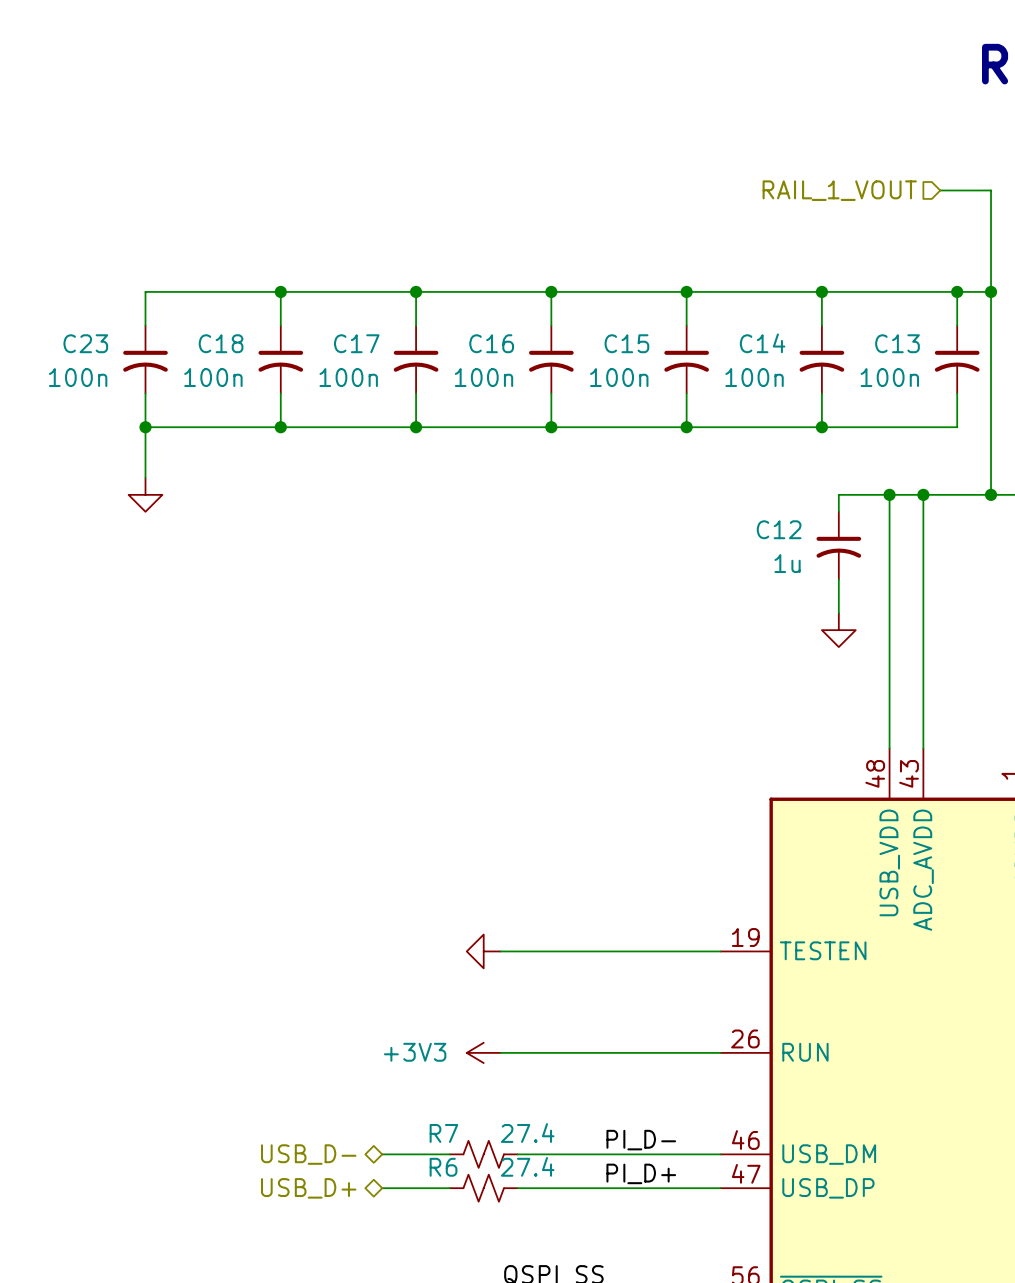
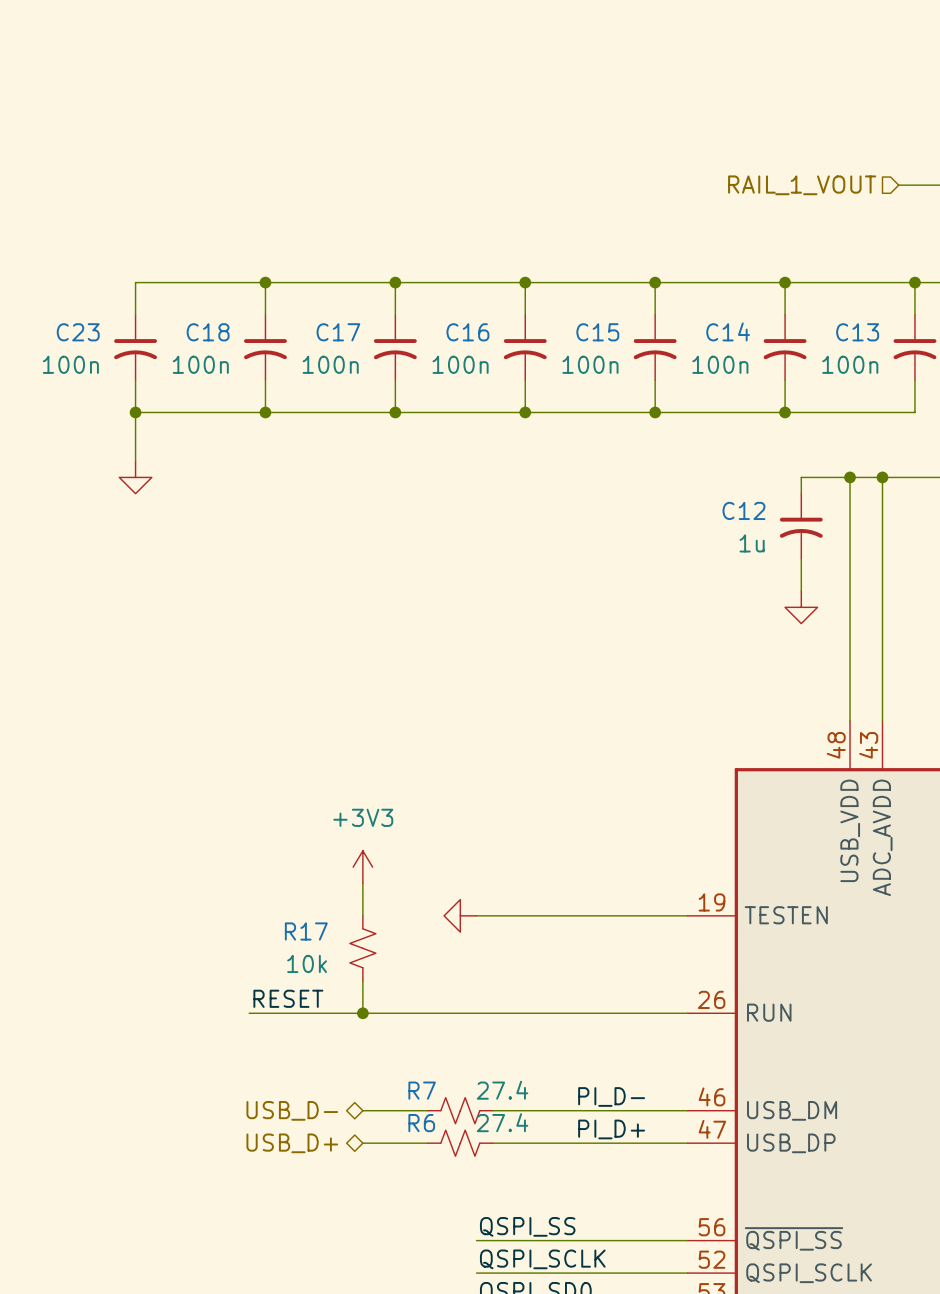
wire: none -> (362, 883) (362, 915)
R17: none -> 10k (362, 948)
wire: none -> (362, 980) (362, 1013)
label: none -> RESET (288, 998)
wire: none -> (249, 1013) (476, 1013)
junction: none -> (362, 1013)
power symbol rotation: 0° (483, 1052) -> 90° clockwise (362, 867)
power symbol position: +3V3 (483, 1052) -> +3V3 (362, 867)

